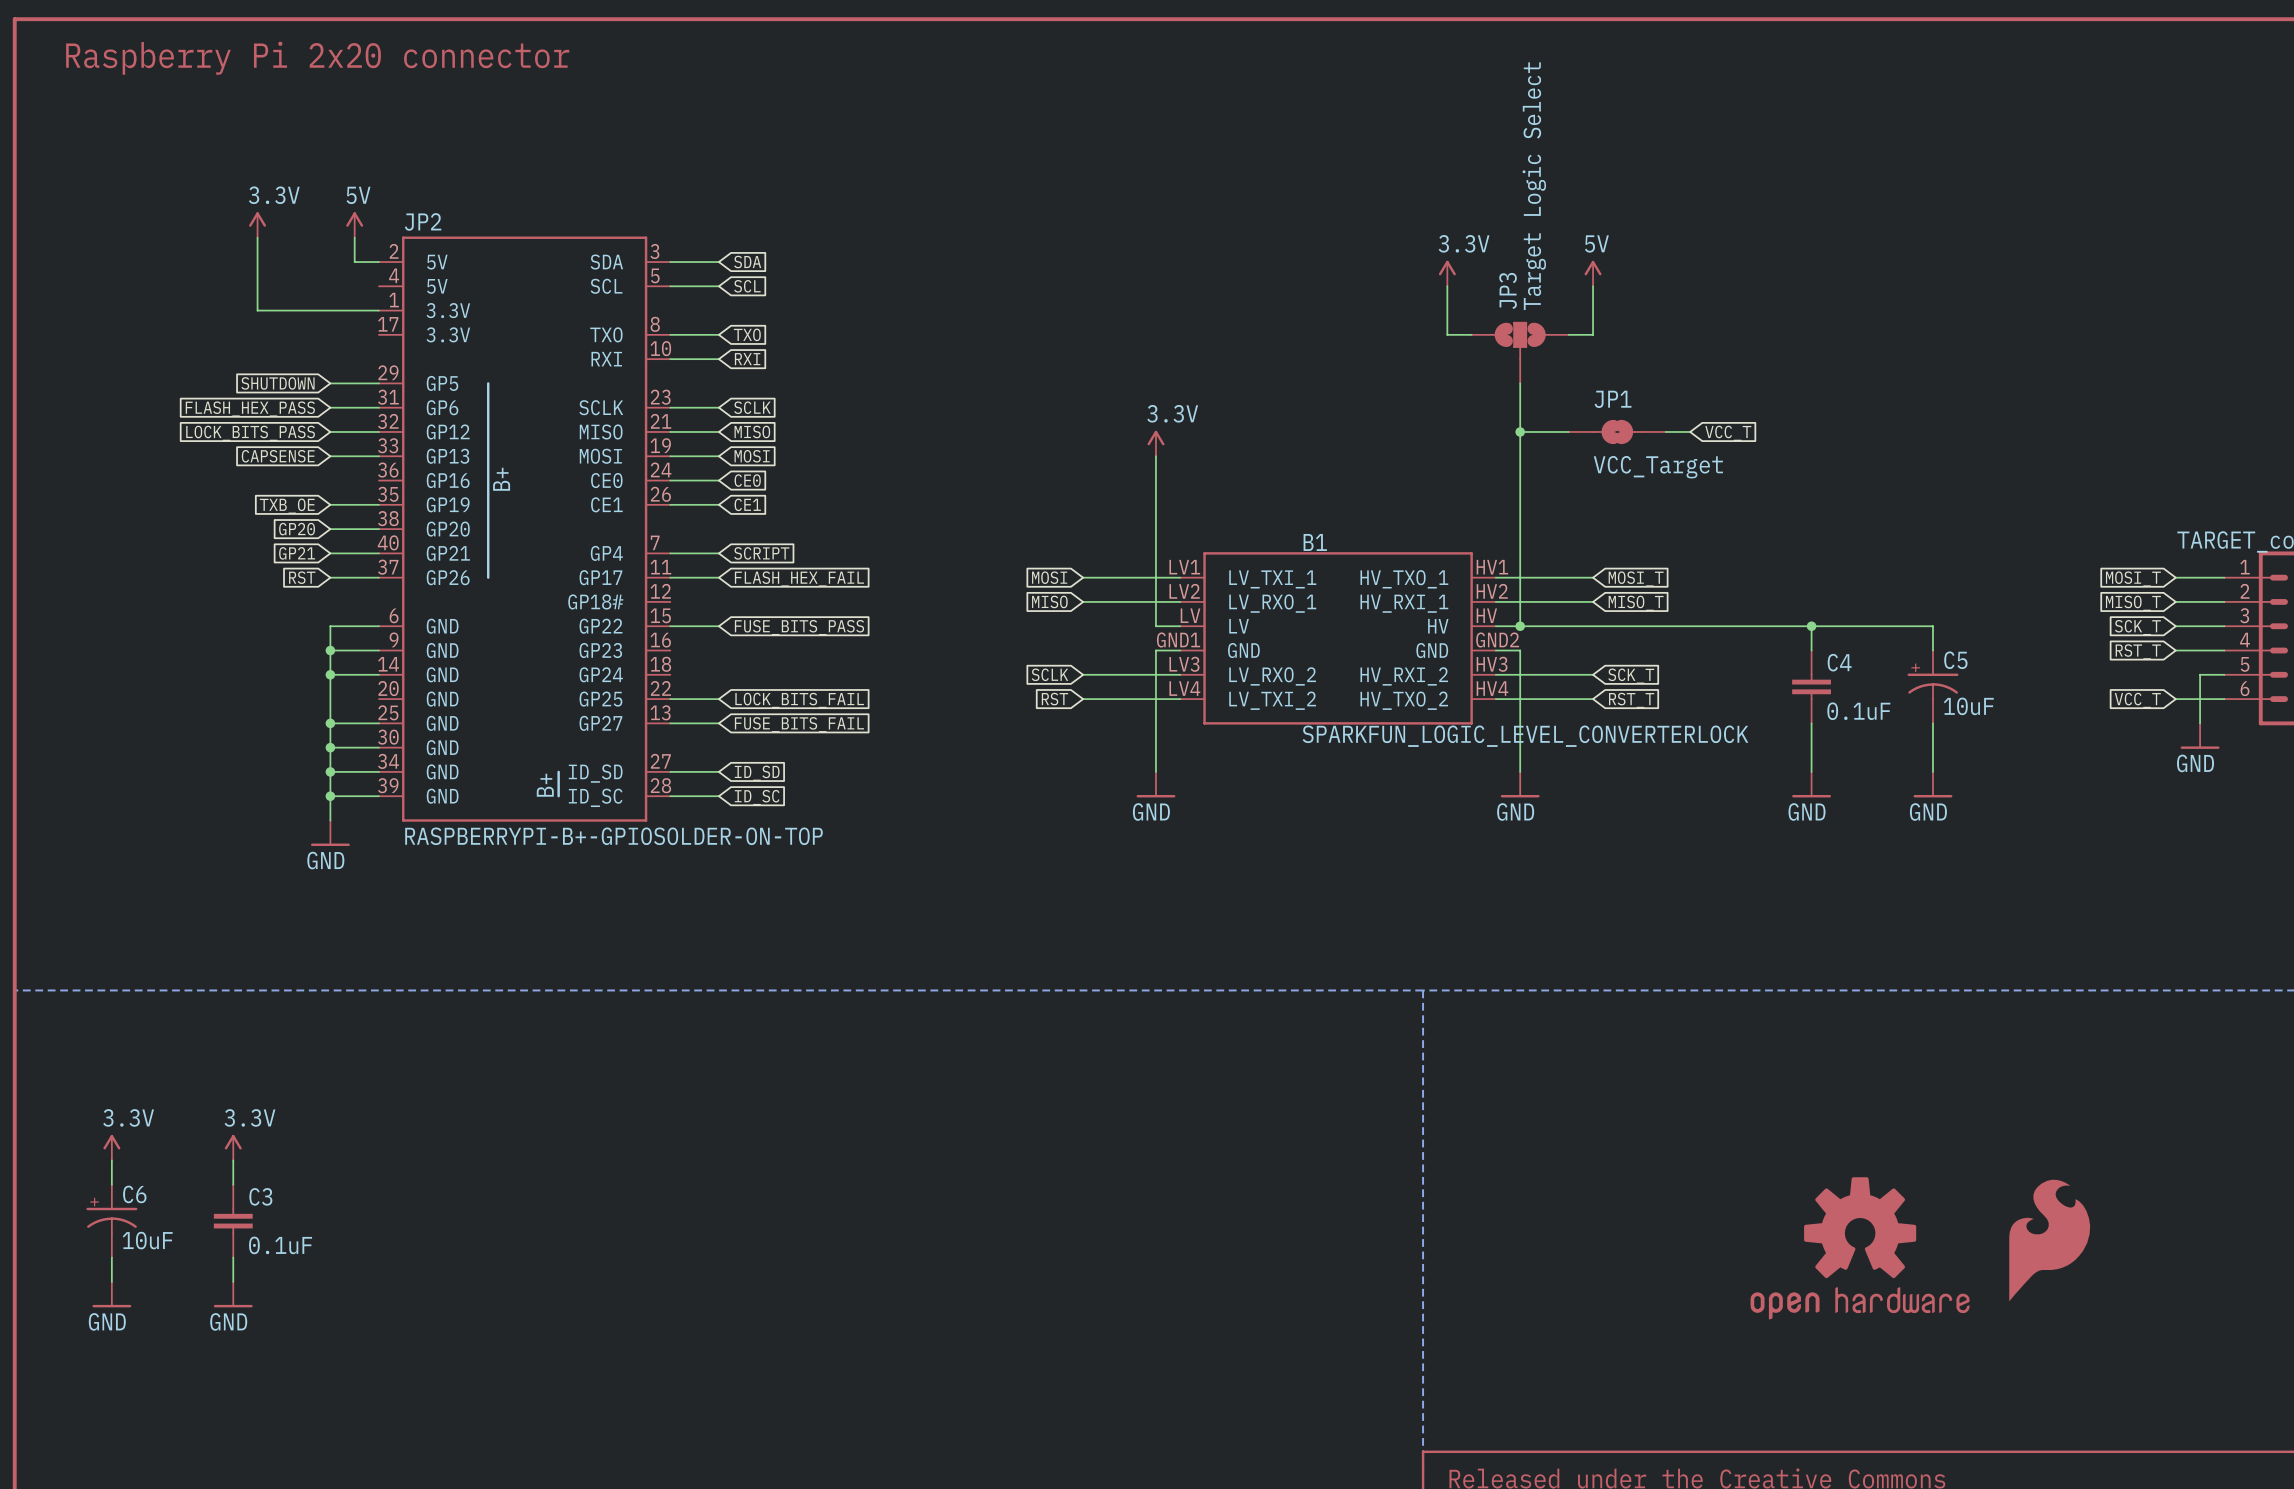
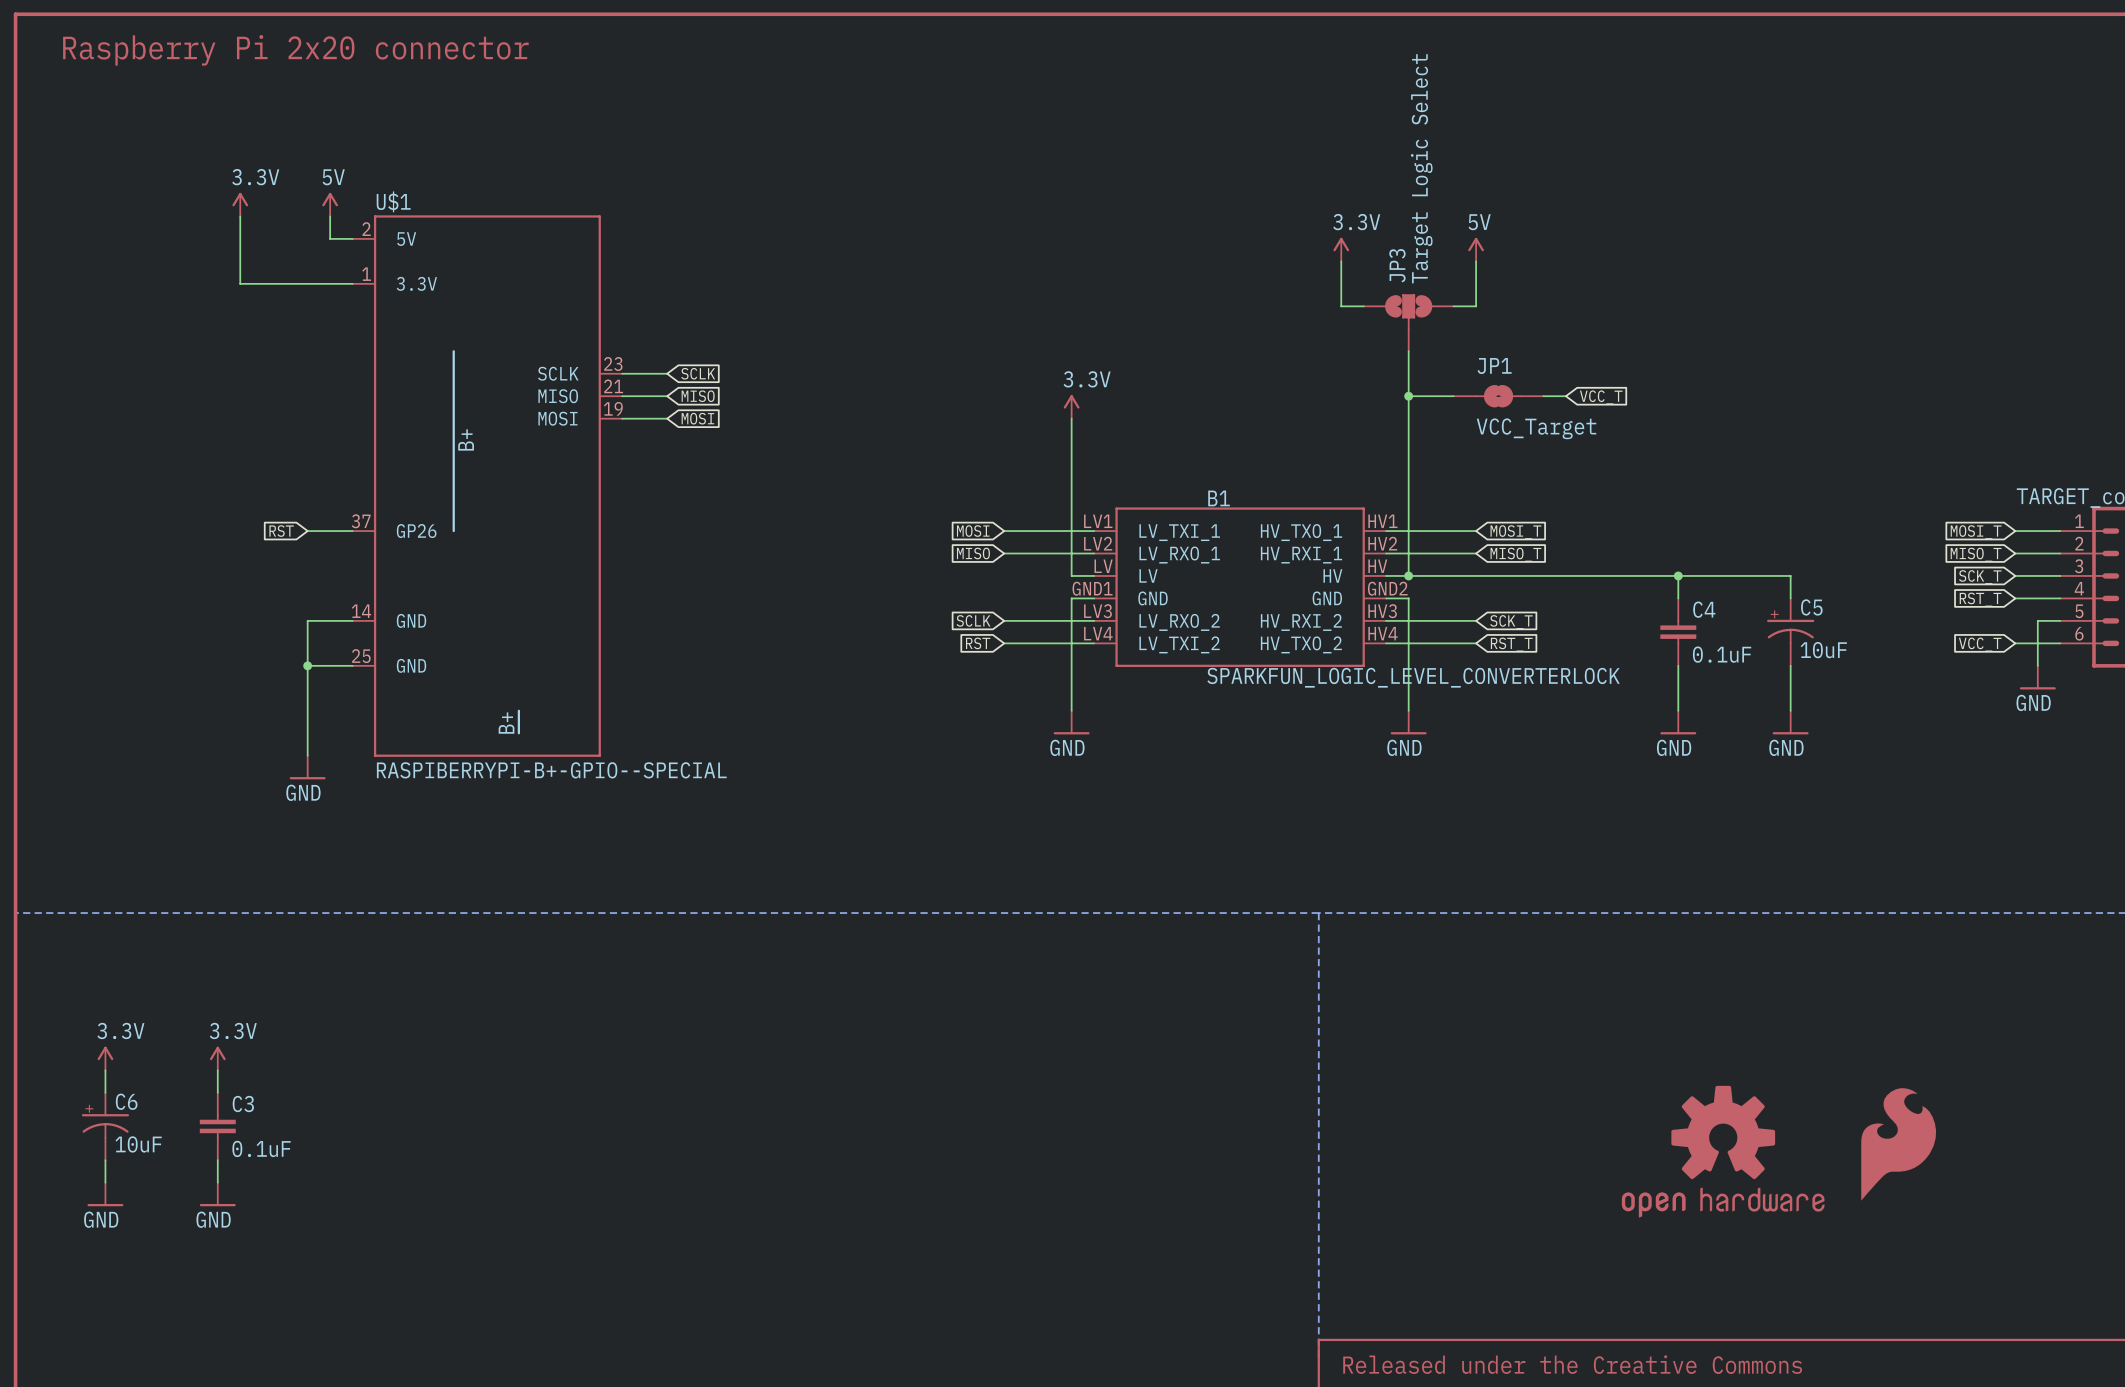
wire: (670, 262) (718, 262) -> none
global label: SDA (747, 262) -> none
wire: (670, 286) (718, 286) -> none
global label: SCL (747, 286) -> none
wire: (670, 334) (718, 334) -> none
global label: TXO (747, 334) -> none
wire: (670, 359) (718, 359) -> none
global label: RXI (747, 359) -> none
global label: SHUTDOWN (277, 383) -> none
wire: (330, 383) (378, 383) -> none
wire: (330, 407) (378, 407) -> none
global label: FLASH_HEX_PASS (250, 409) -> none
wire: (330, 431) (378, 431) -> none
global label: LOCK_BITS_PASS (250, 433) -> none
global label: CAPSENSE (278, 456) -> none
wire: (330, 456) (378, 456) -> none
wire: (670, 480) (718, 480) -> none
global label: CE0 (747, 480) -> none
wire: (330, 504) (378, 504) -> none
wire: (670, 504) (718, 504) -> none
global label: CE1 (747, 504) -> none
global label: TXB_OE (287, 506) -> none
global label: GP20 (297, 529) -> none
wire: (330, 529) (378, 529) -> none
JP2: RASPBERRYPI-B+-GPIOSOLDER-ON-TOP (524, 529) -> none
U$1: none -> RASPIBERRYPI-B+-GPIO--SPECIAL (487, 486)
global label: GP21 (297, 553) -> none
wire: (330, 553) (378, 553) -> none
wire: (670, 553) (718, 553) -> none
global label: SCRIPT (761, 553) -> none
wire: (670, 577) (718, 577) -> none
global label: FLASH_HEX_FAIL (799, 579) -> none
wire: (378, 626) (330, 626) (330, 674) -> none
wire: (670, 626) (718, 626) -> none
global label: FUSE_BITS_PASS (799, 627) -> none
wire: (330, 650) (378, 650) -> none
junction: (330, 650) -> none
junction: (330, 674) -> none
wire: (670, 699) (718, 699) -> none
global label: LOCK_BITS_FAIL (799, 700) -> none
wire: (670, 723) (718, 723) -> none
global label: FUSE_BITS_FAIL (799, 724) -> none
wire: (330, 747) (378, 747) -> none
junction: (330, 747) -> none
wire: (330, 771) (378, 771) -> none
junction: (330, 771) -> none
wire: (670, 771) (718, 771) -> none
global label: ID_SD (757, 773) -> none
wire: (330, 796) (378, 796) -> none
junction: (330, 796) -> none
wire: (670, 796) (718, 796) -> none
global label: ID_SC (757, 797) -> none

